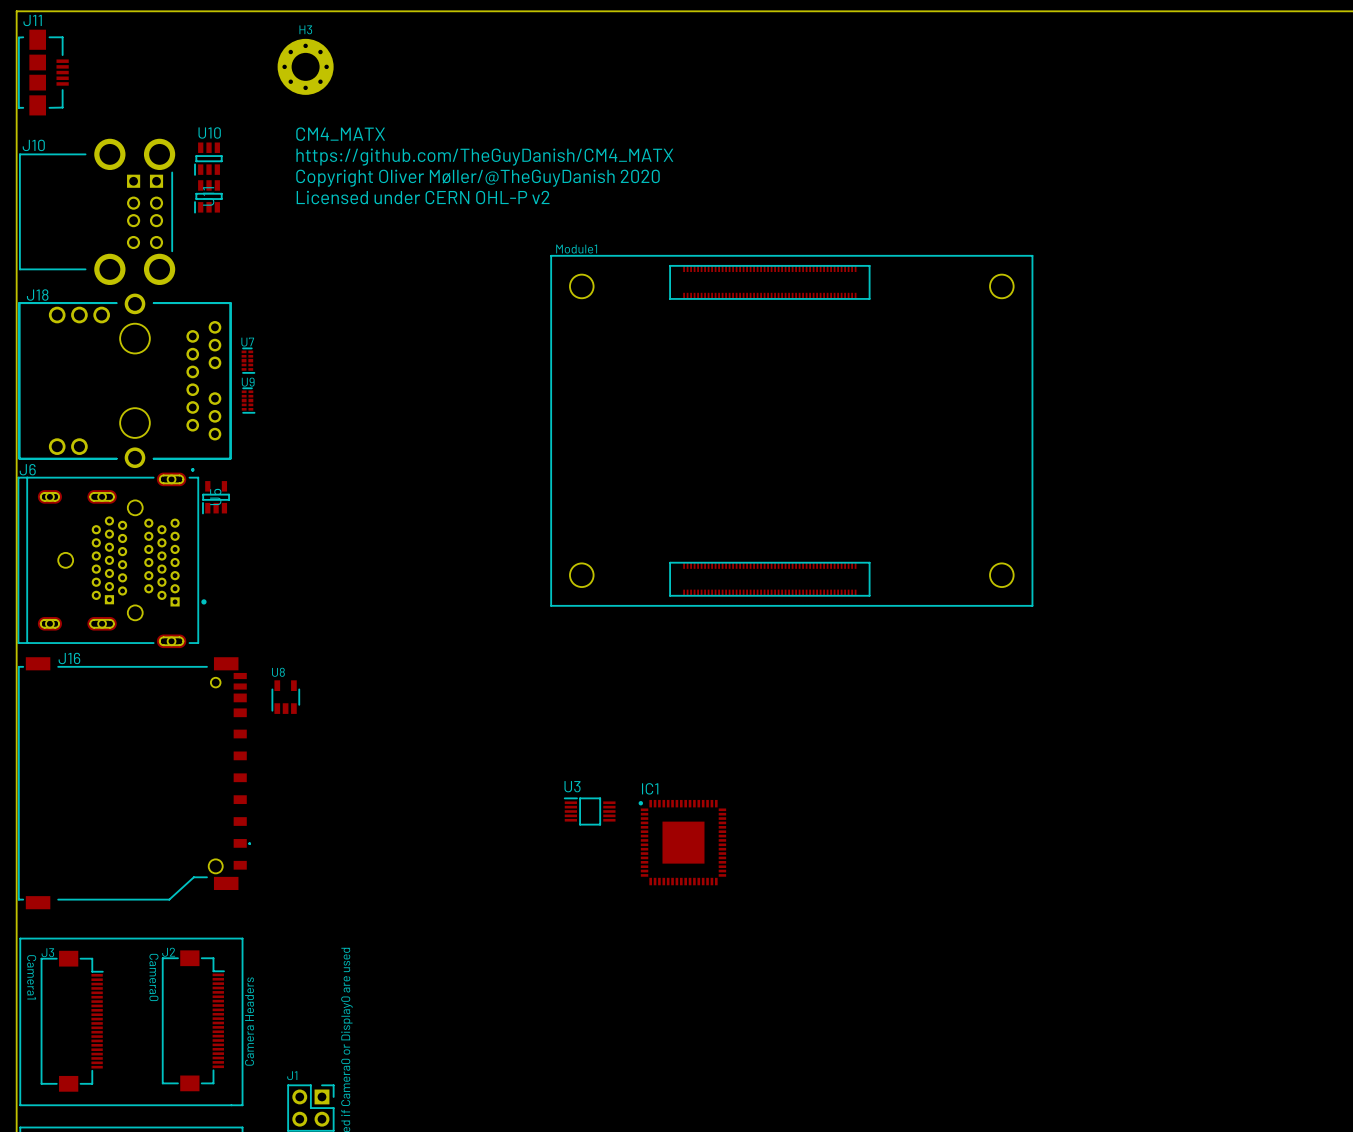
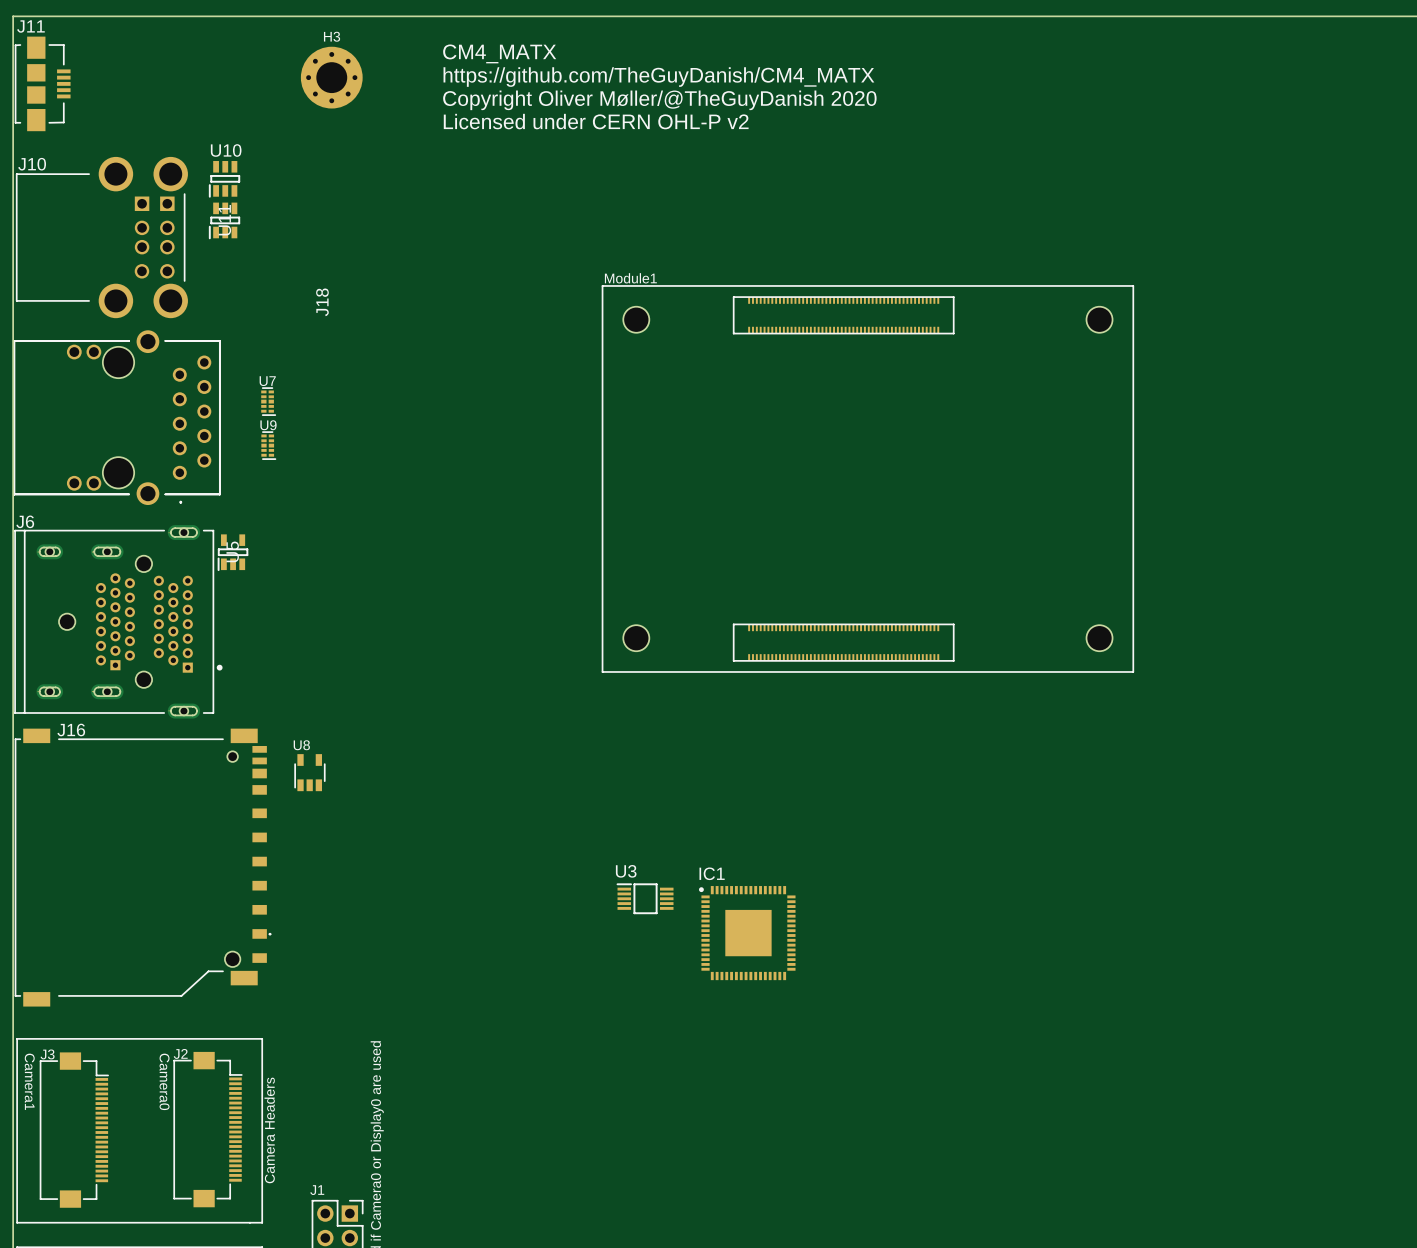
text position: CM4_MATX (340, 134) -> CM4_MATX (499, 53)
text position: https://github.com/TheGuyDanish/CM4_MATX (484, 157) -> https://github.com/TheGuyDanish/CM4_MATX (658, 77)
text position: Copyright Oliver Møller/@TheGuyDanish 2020 (477, 178) -> Copyright Oliver Møller/@TheGuyDanish 2020 (659, 100)
text position: Licensed under CERN OHL-P v2 (423, 197) -> Licensed under CERN OHL-P v2 (596, 121)
J18 footprint: [18, 293, 231, 472] -> [13, 330, 221, 506]
J18 name position: J18 (37, 295) -> J18 (322, 302)

